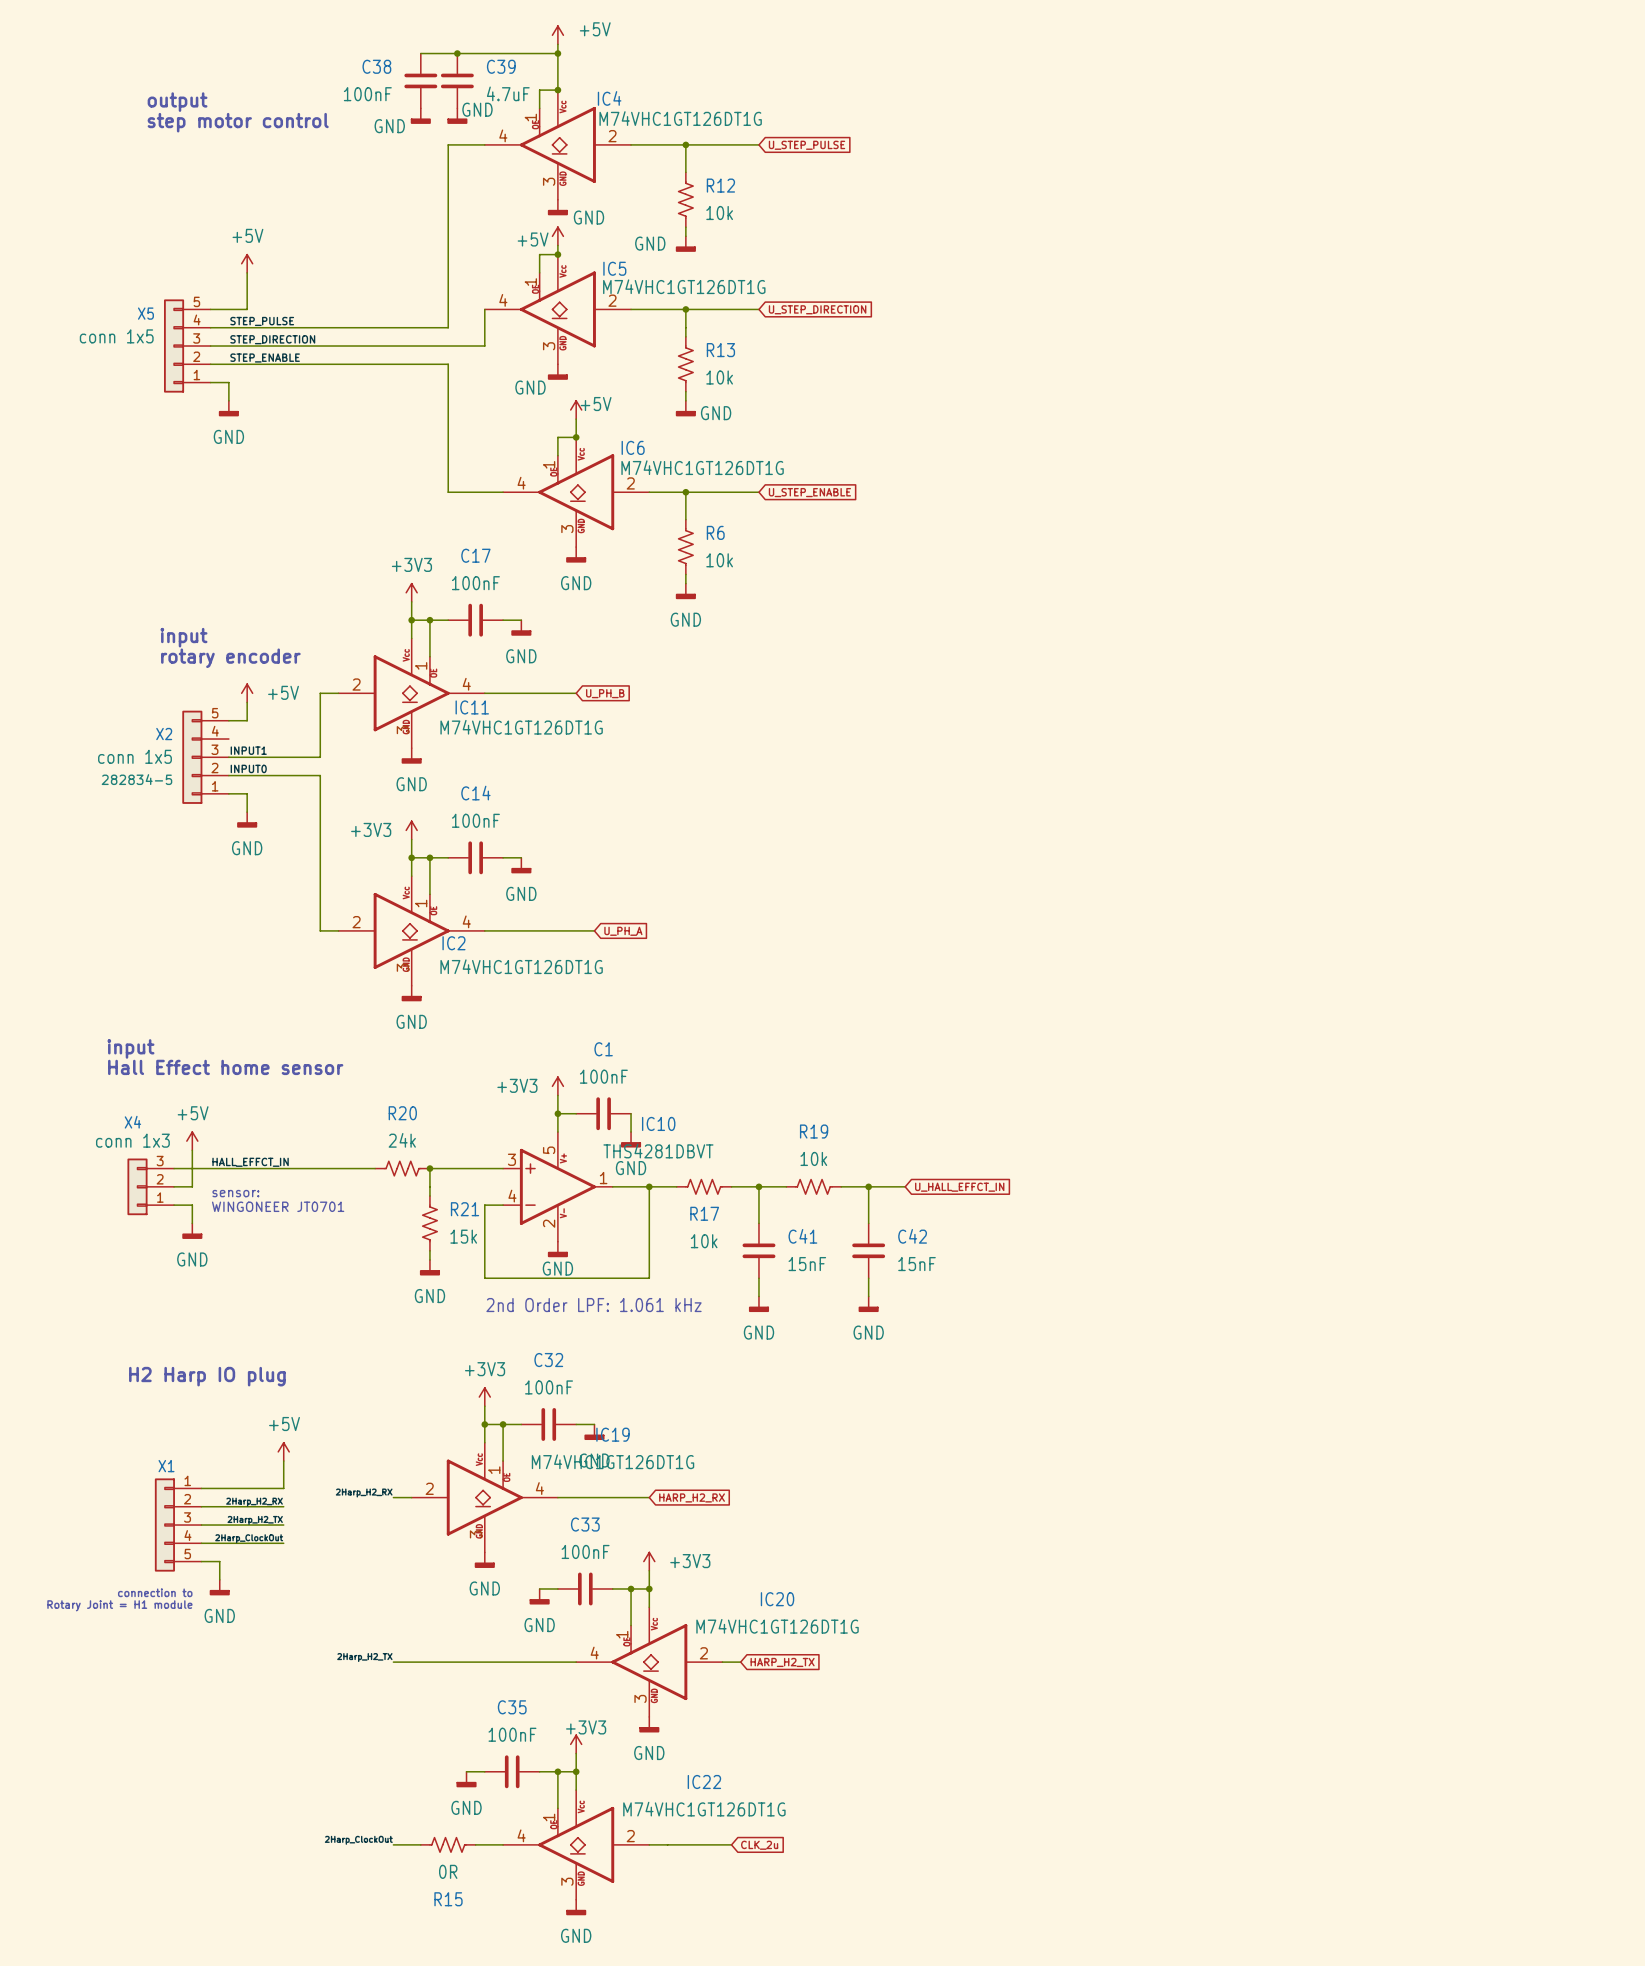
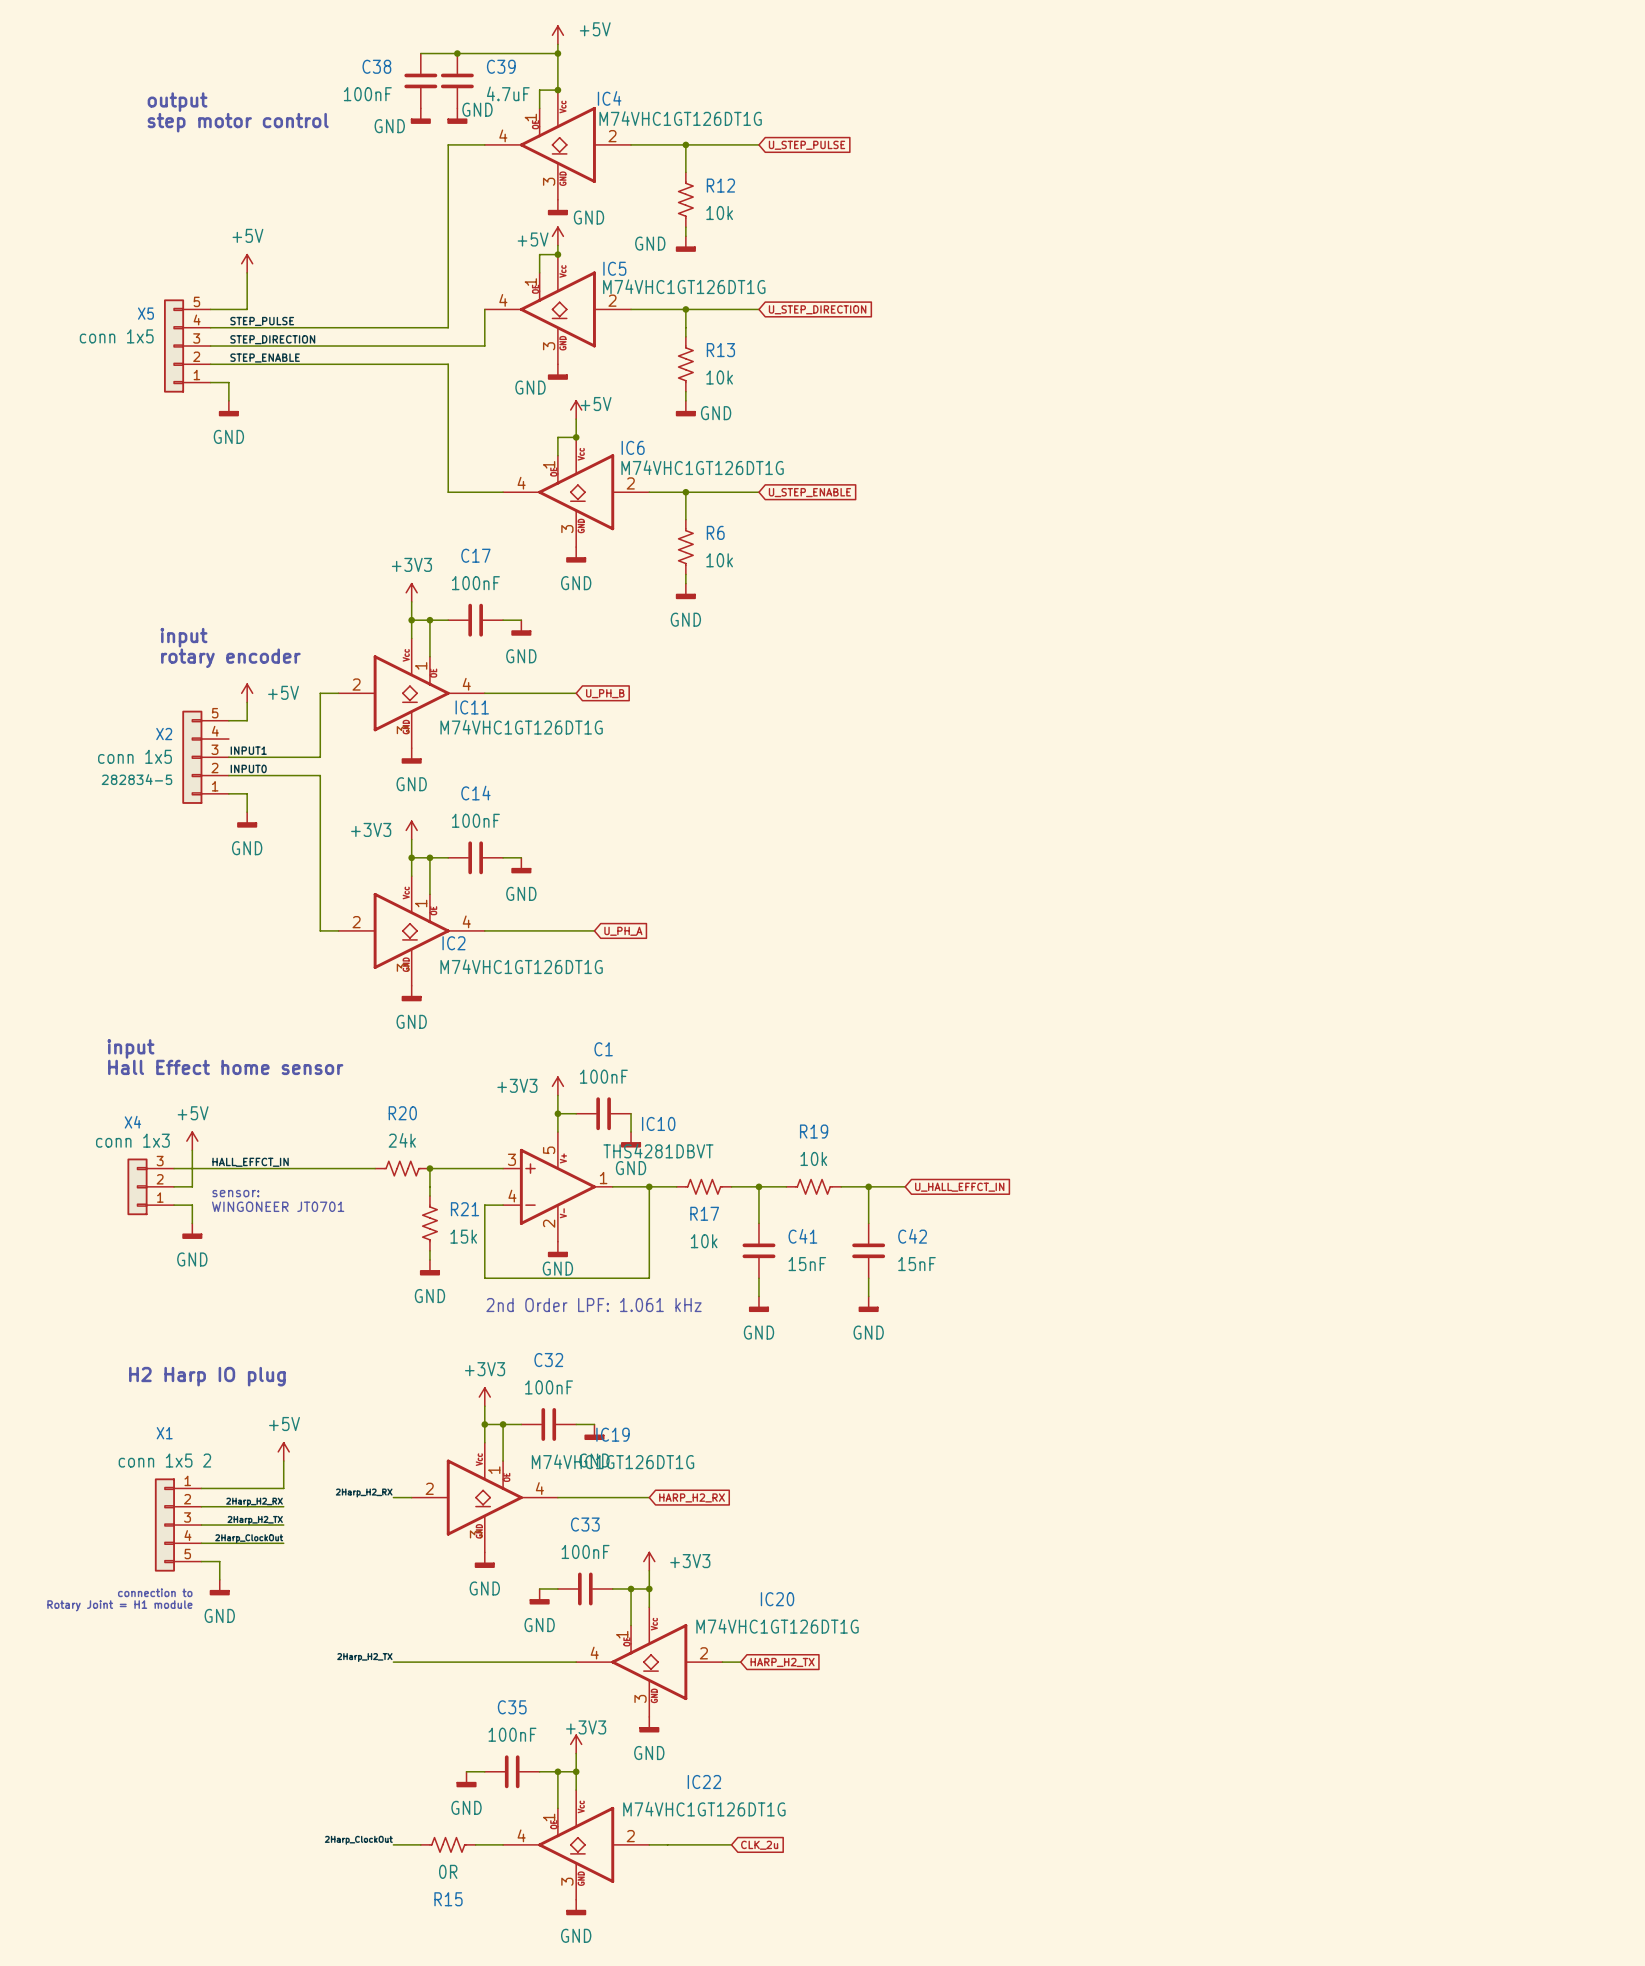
X1 value: none -> conn 1x5 2 (164, 1460)
X1 name position: X1 (166, 1466) -> X1 (164, 1433)

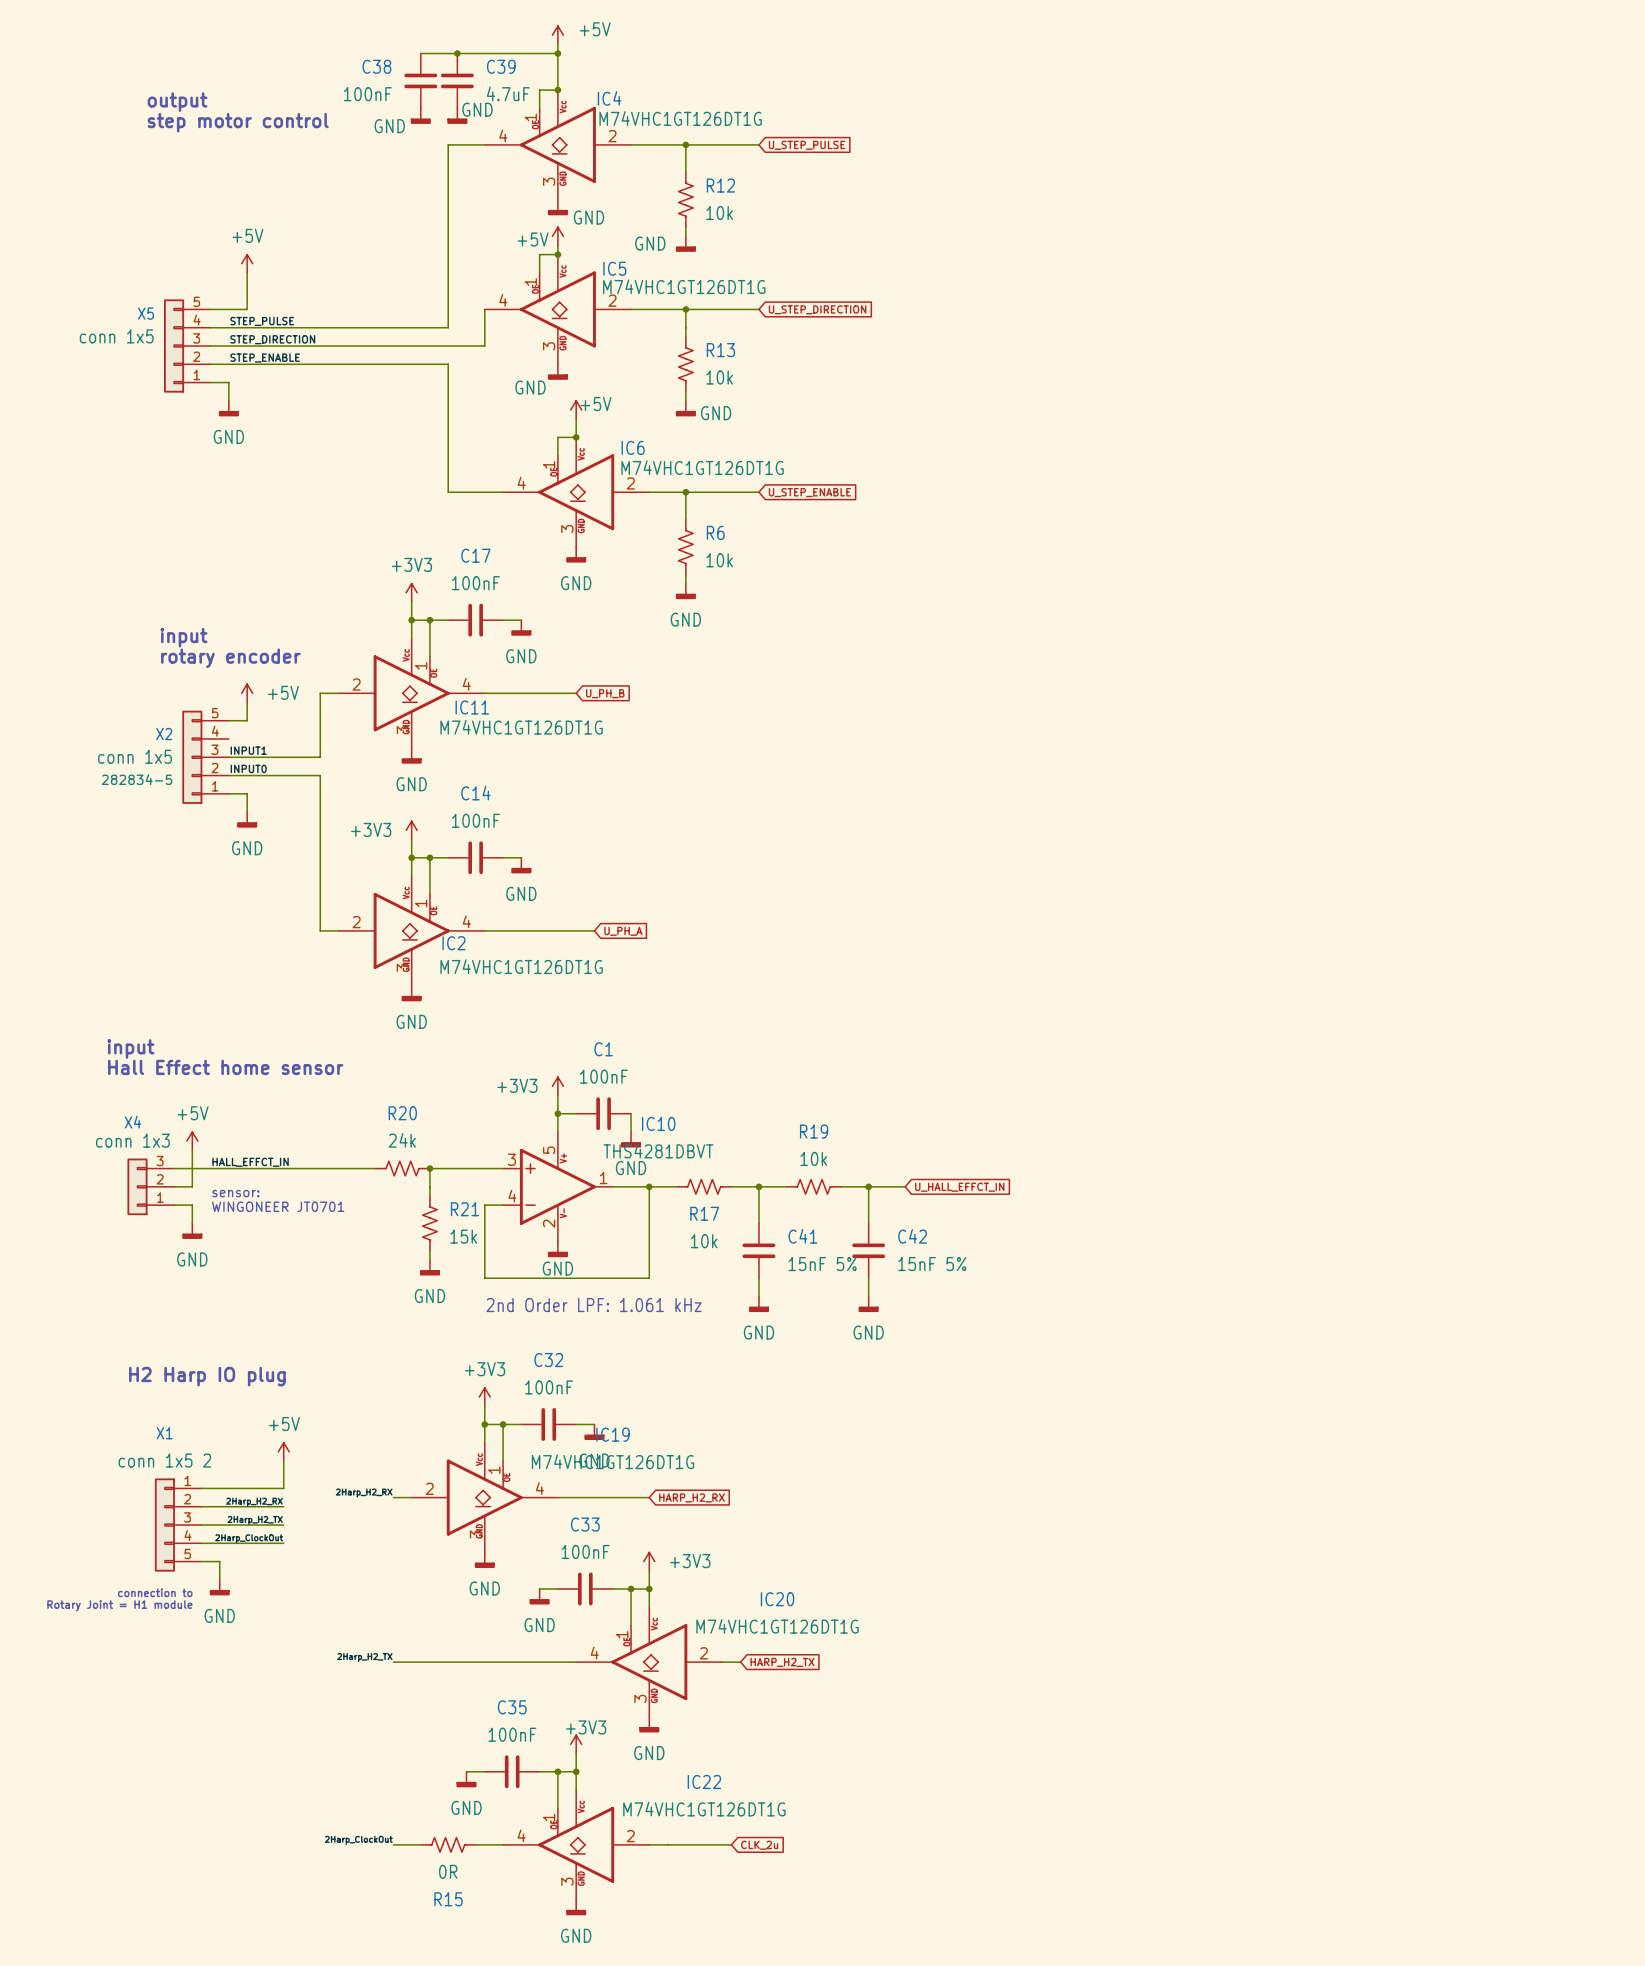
C41 value: 15nF (807, 1264) -> 15nF 5% (822, 1264)
C42 value: 15nF (916, 1264) -> 15nF 5% (932, 1264)

